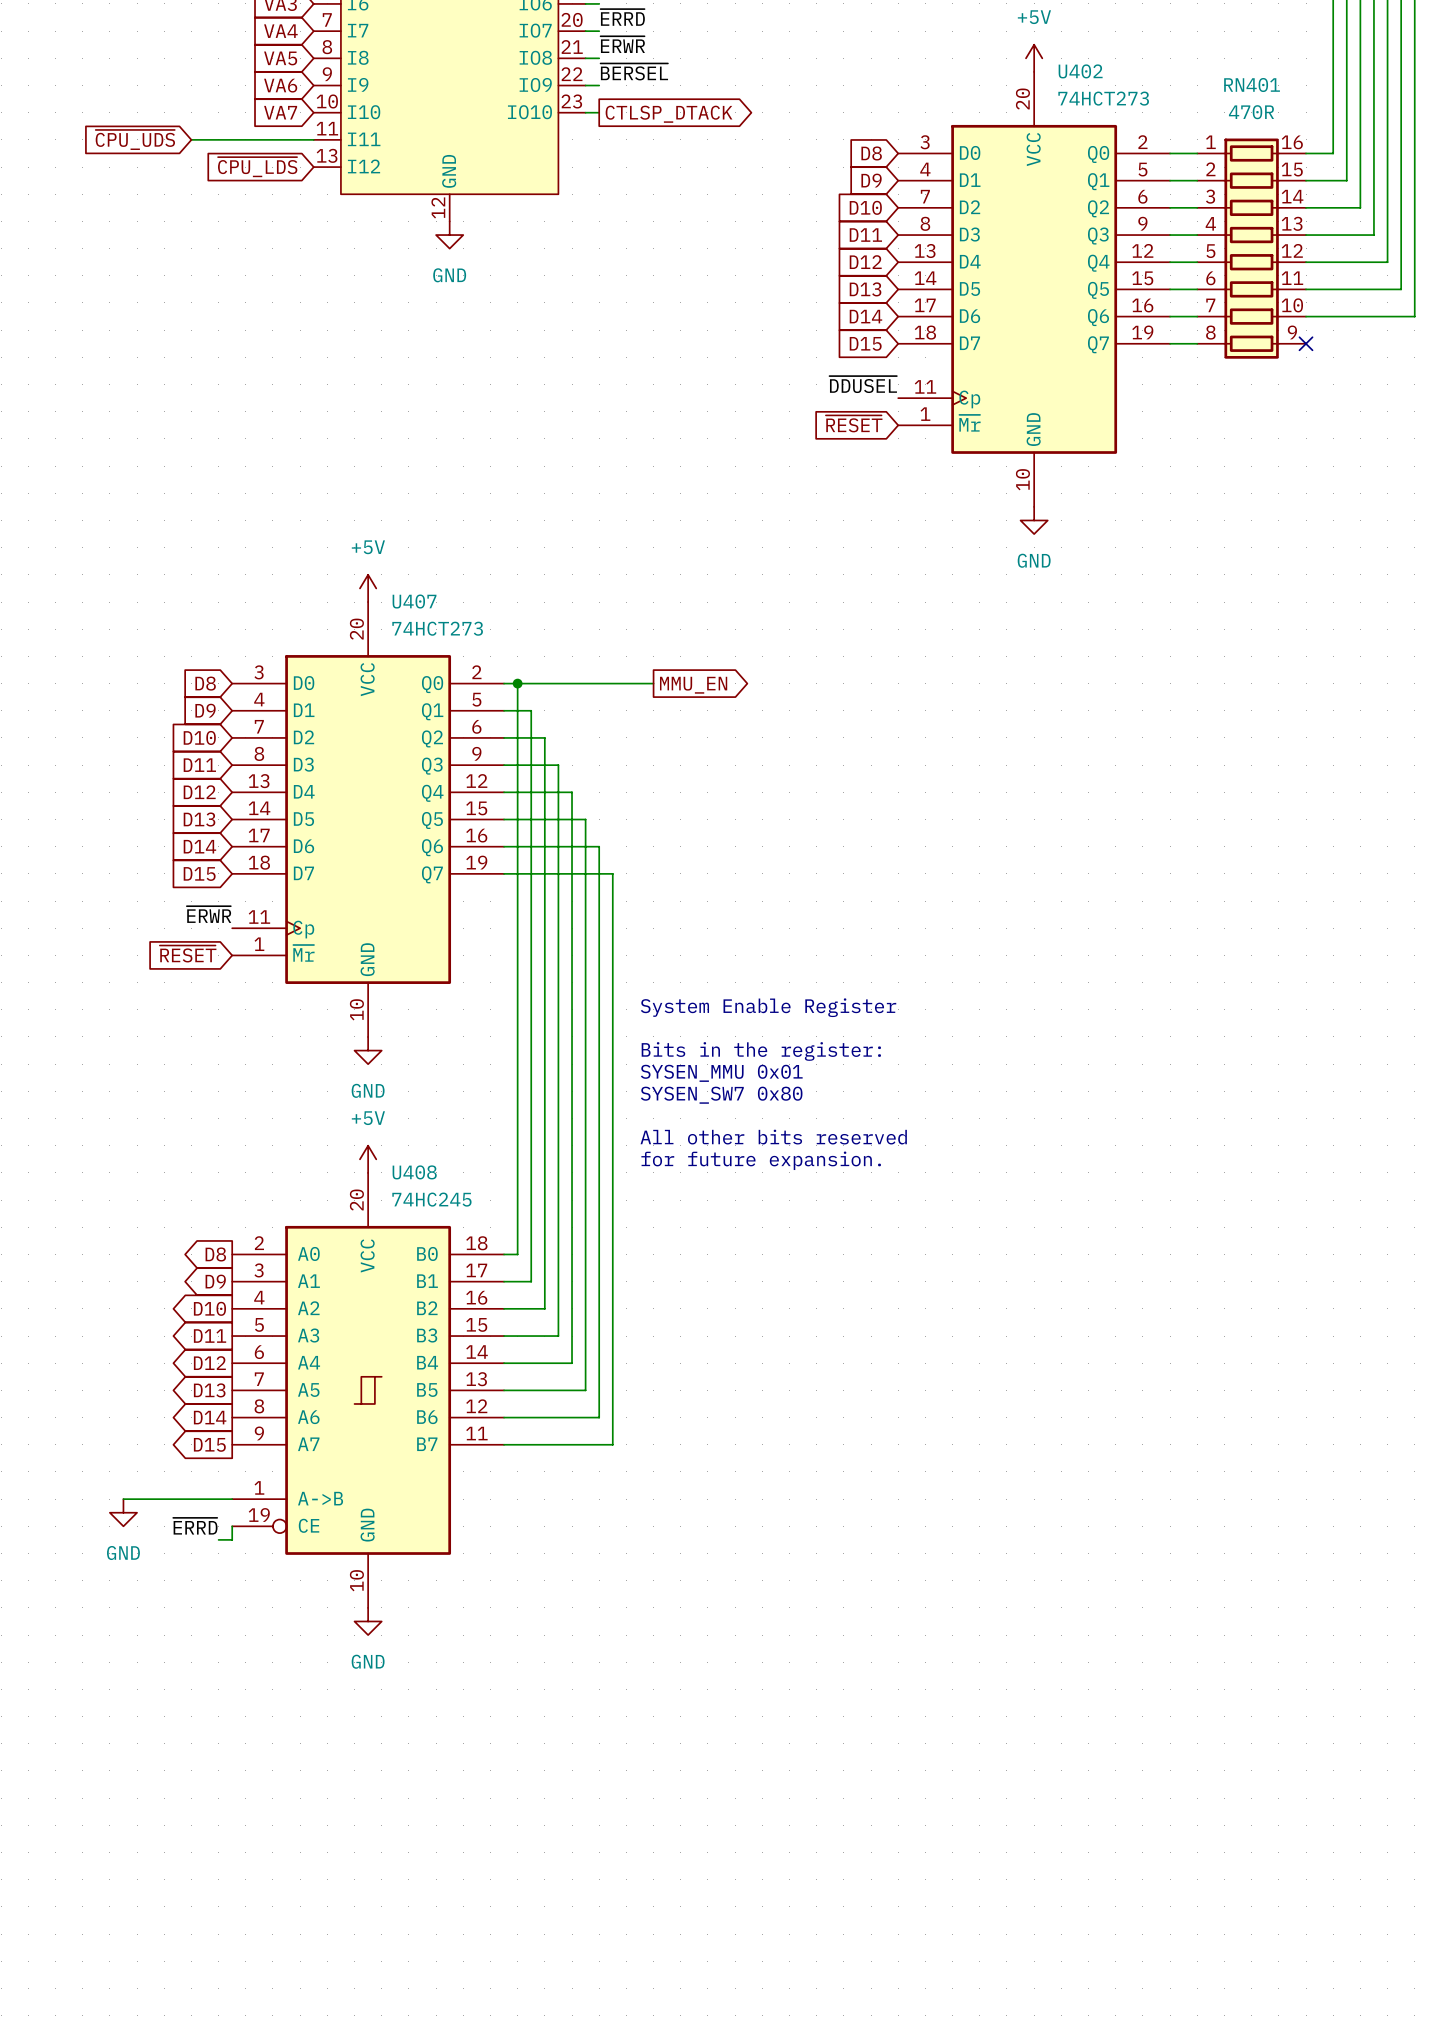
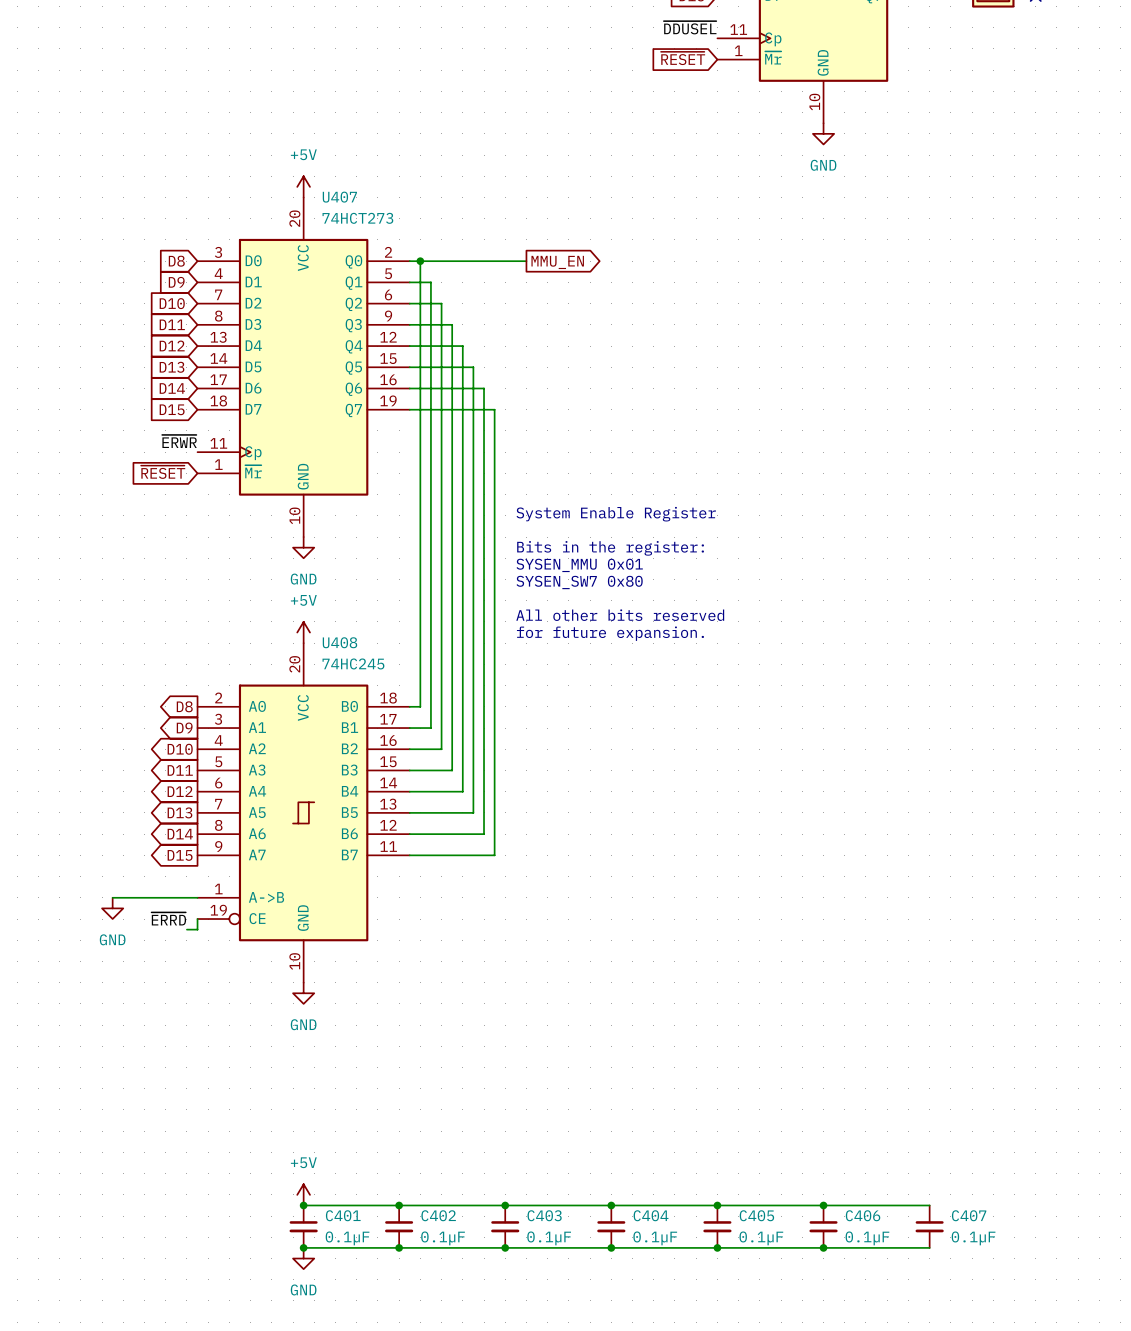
power symbol: none -> +5V (303, 1194)
wire: none -> (303, 1205) (929, 1205)
junction: none -> (303, 1205)
junction: none -> (399, 1205)
junction: none -> (505, 1205)
junction: none -> (611, 1205)
junction: none -> (717, 1205)
junction: none -> (823, 1205)
C401: none -> 0.1µF (303, 1226)
C402: none -> 0.1µF (399, 1226)
C403: none -> 0.1µF (505, 1226)
C404: none -> 0.1µF (611, 1226)
C405: none -> 0.1µF (717, 1226)
C406: none -> 0.1µF (823, 1226)
C407: none -> 0.1µF (929, 1226)
wire: none -> (303, 1247) (929, 1247)
junction: none -> (303, 1247)
junction: none -> (399, 1247)
junction: none -> (505, 1247)
junction: none -> (611, 1247)
junction: none -> (717, 1247)
junction: none -> (823, 1247)
power symbol: none -> GND (303, 1258)

